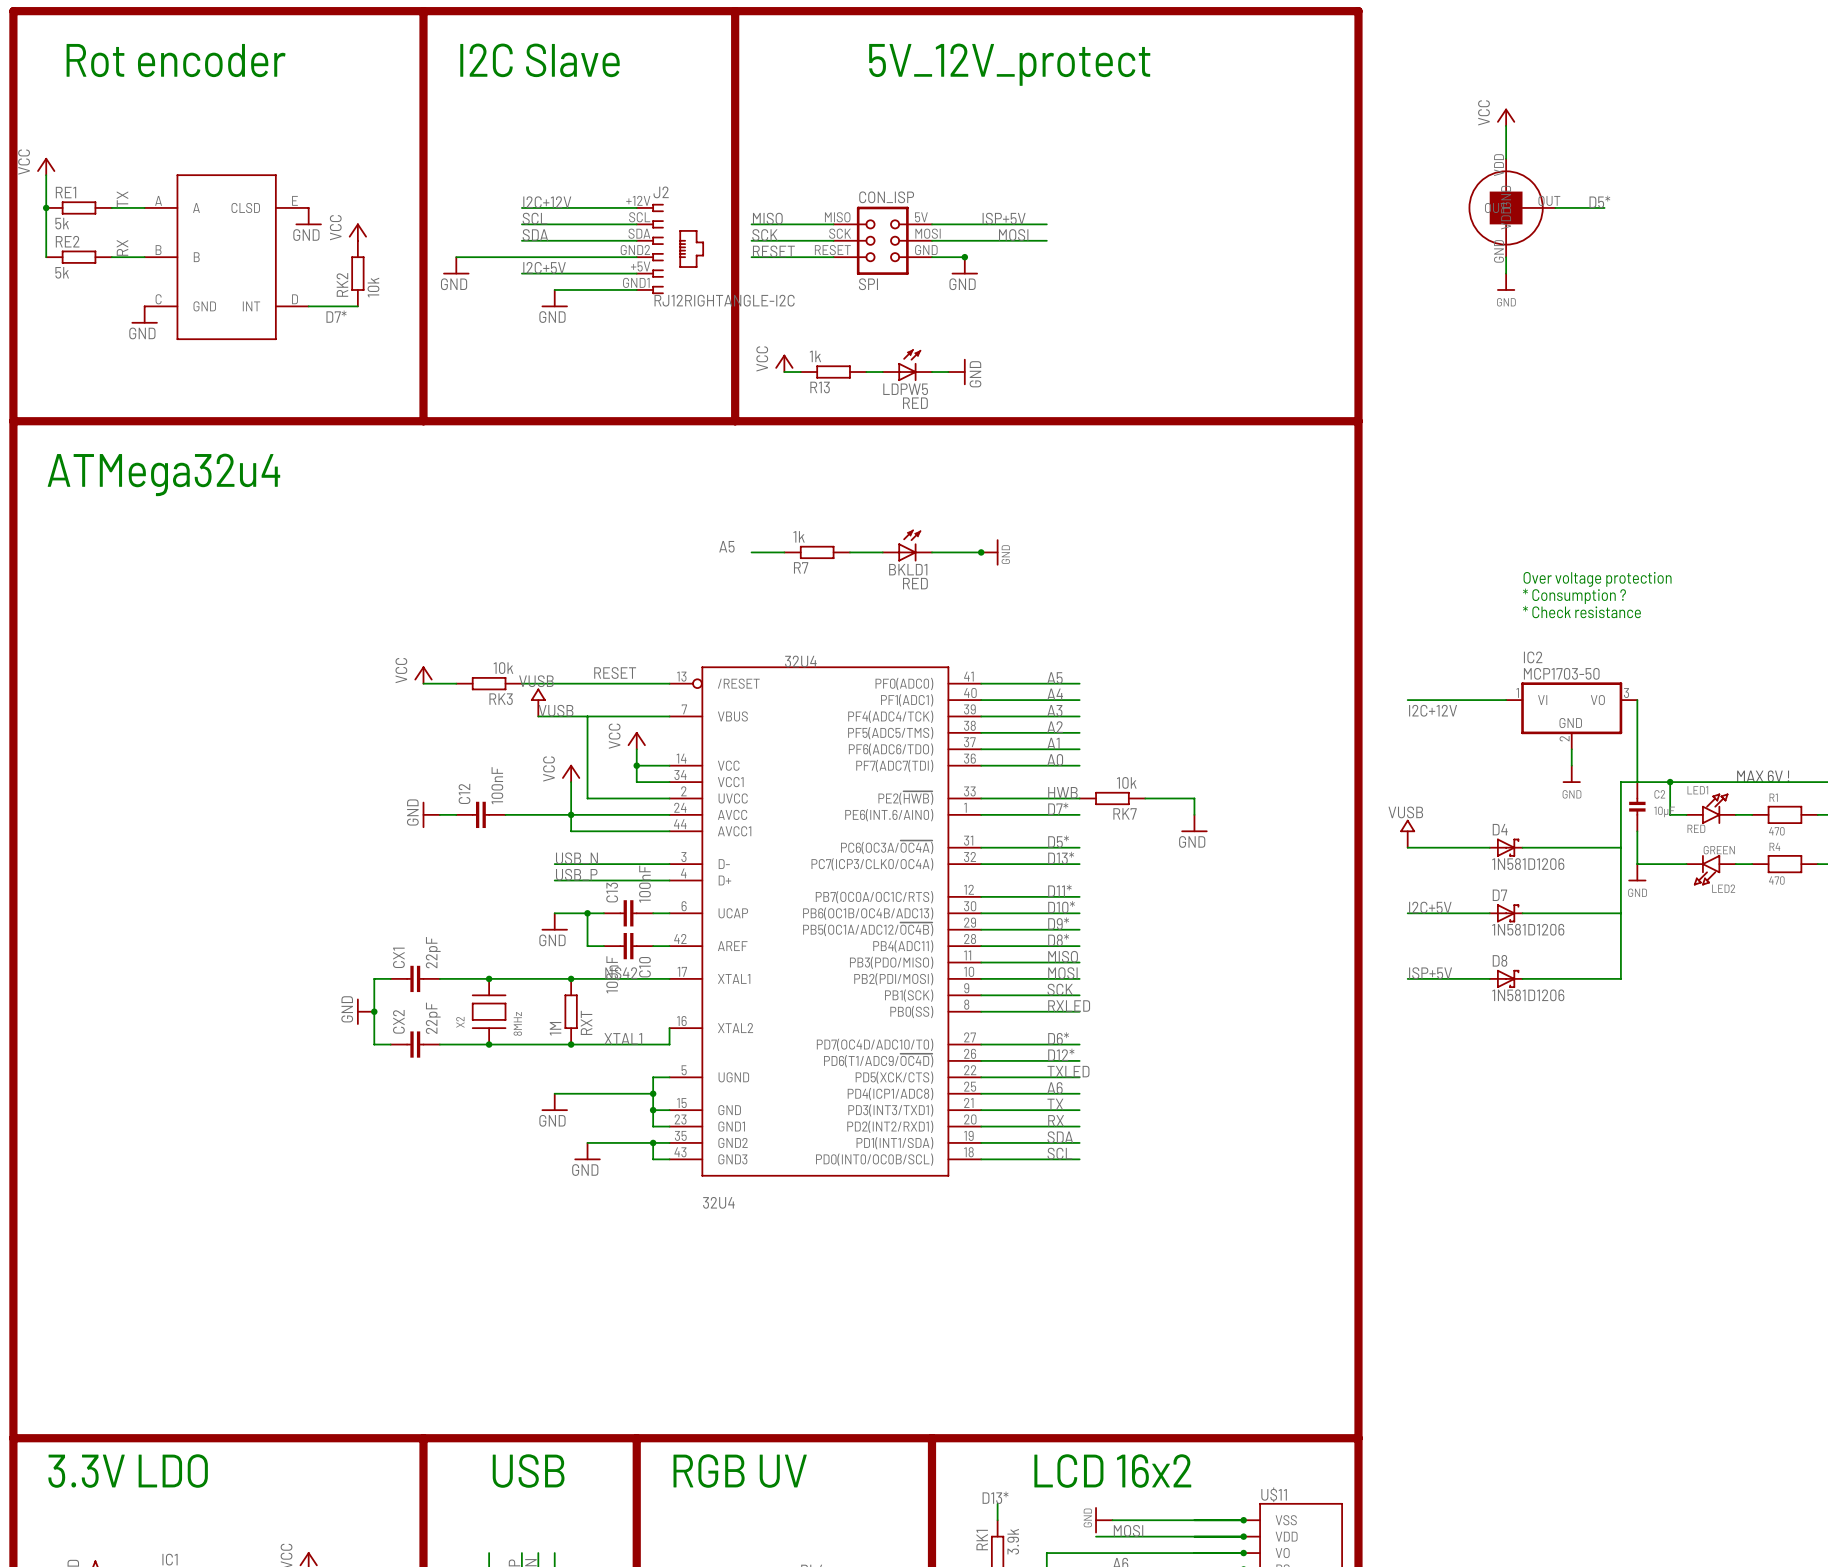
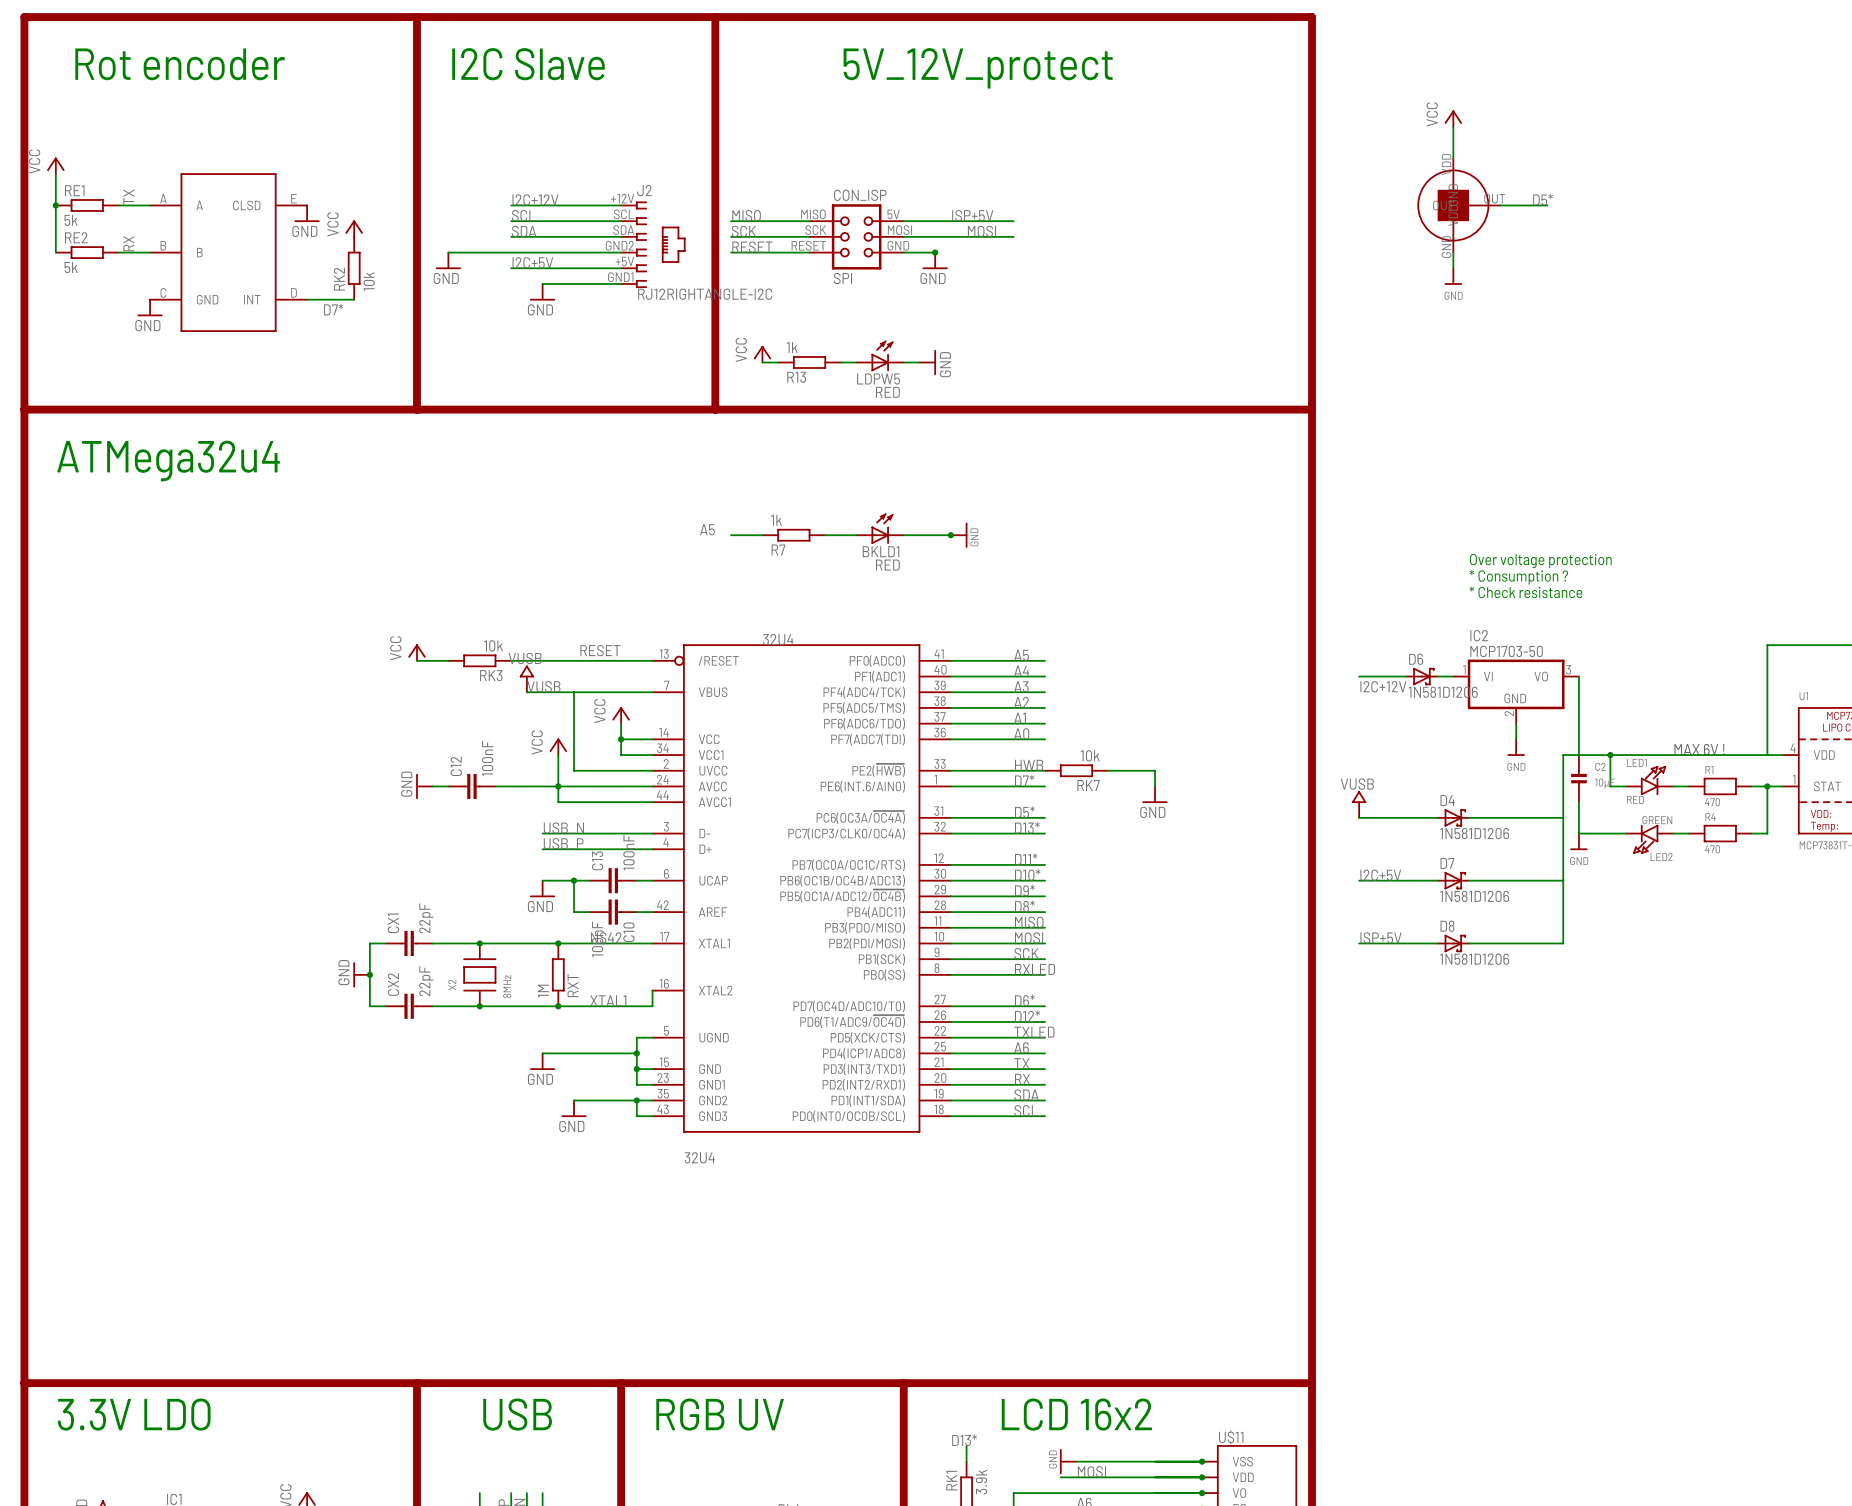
D6: none -> 1N581D1206 (1421, 676)

